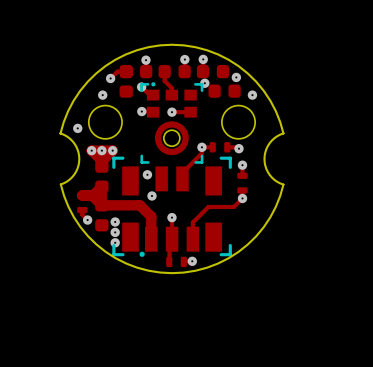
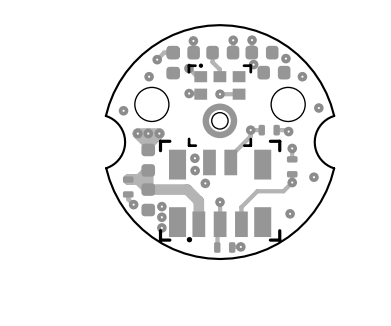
via: none -> (318, 108)
via: none -> (195, 170)
via: none -> (313, 177)
via: (152, 195) -> none
via: none -> (205, 183)
via: none -> (290, 213)

